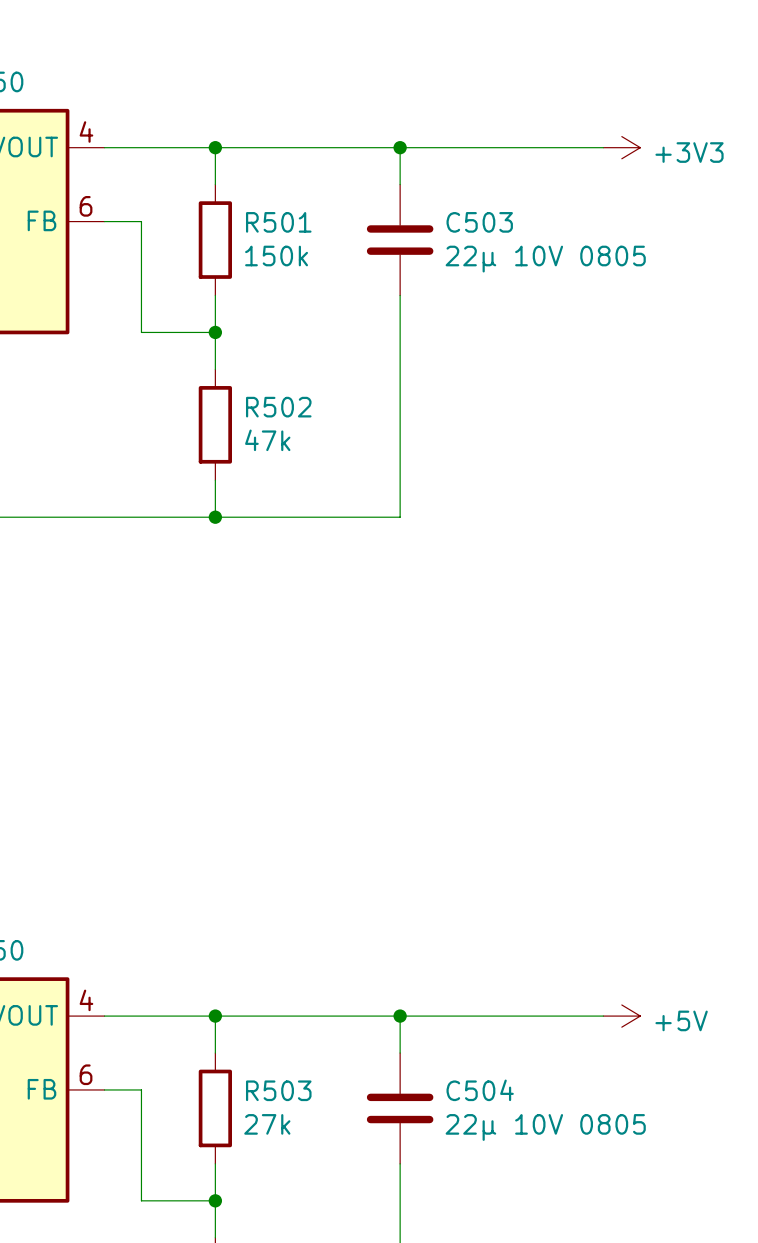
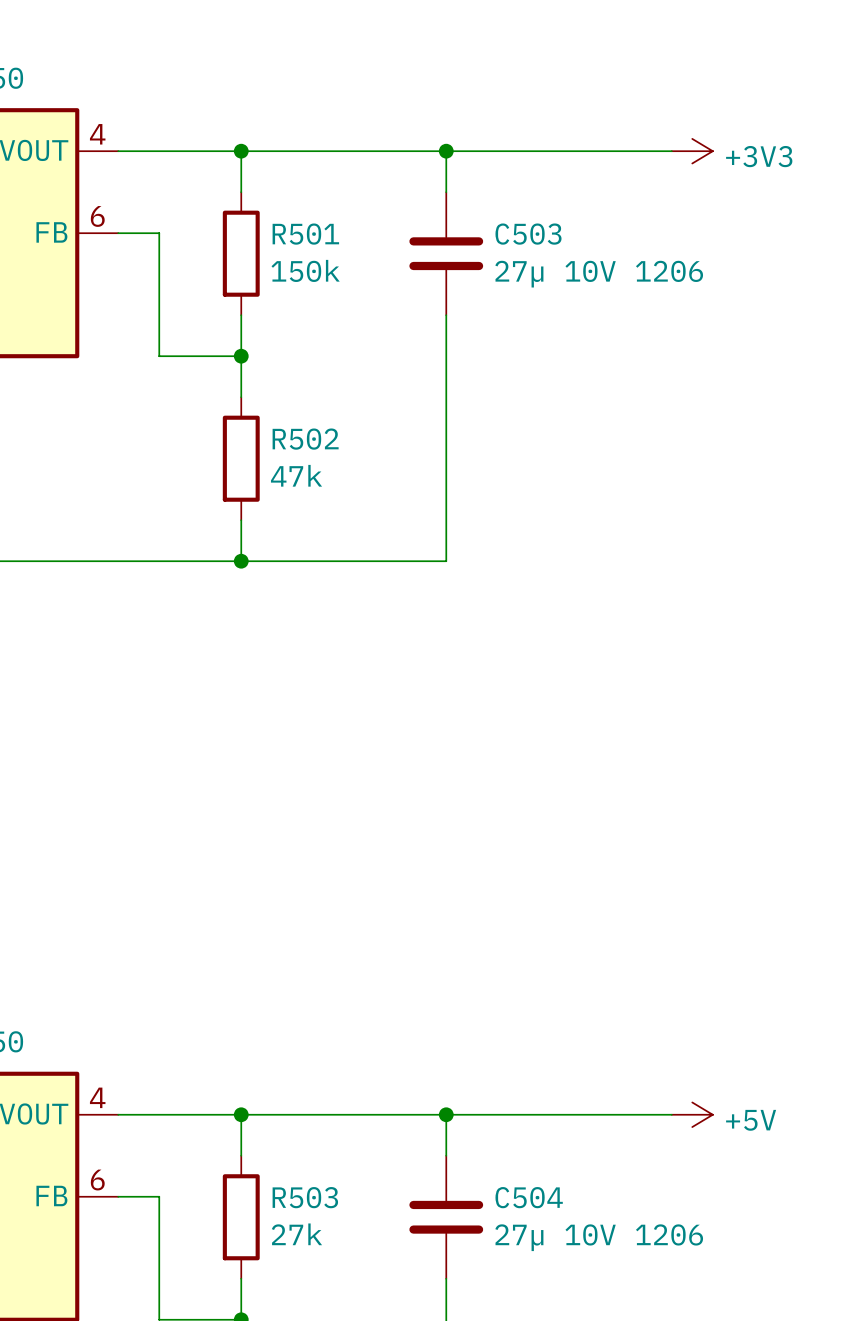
C503 value: 22µ 10V 0805 (545, 259) -> 27µ 10V 1206 (599, 274)
C504 value: 22µ 10V 0805 (545, 1127) -> 27µ 10V 1206 (599, 1237)

